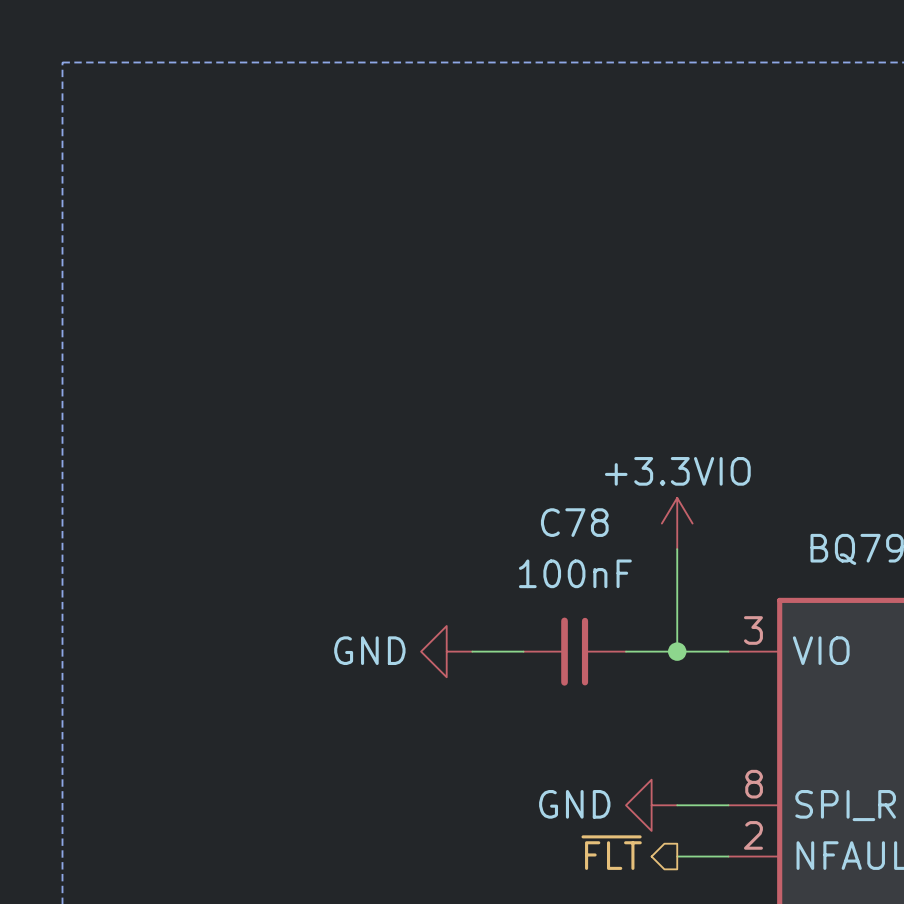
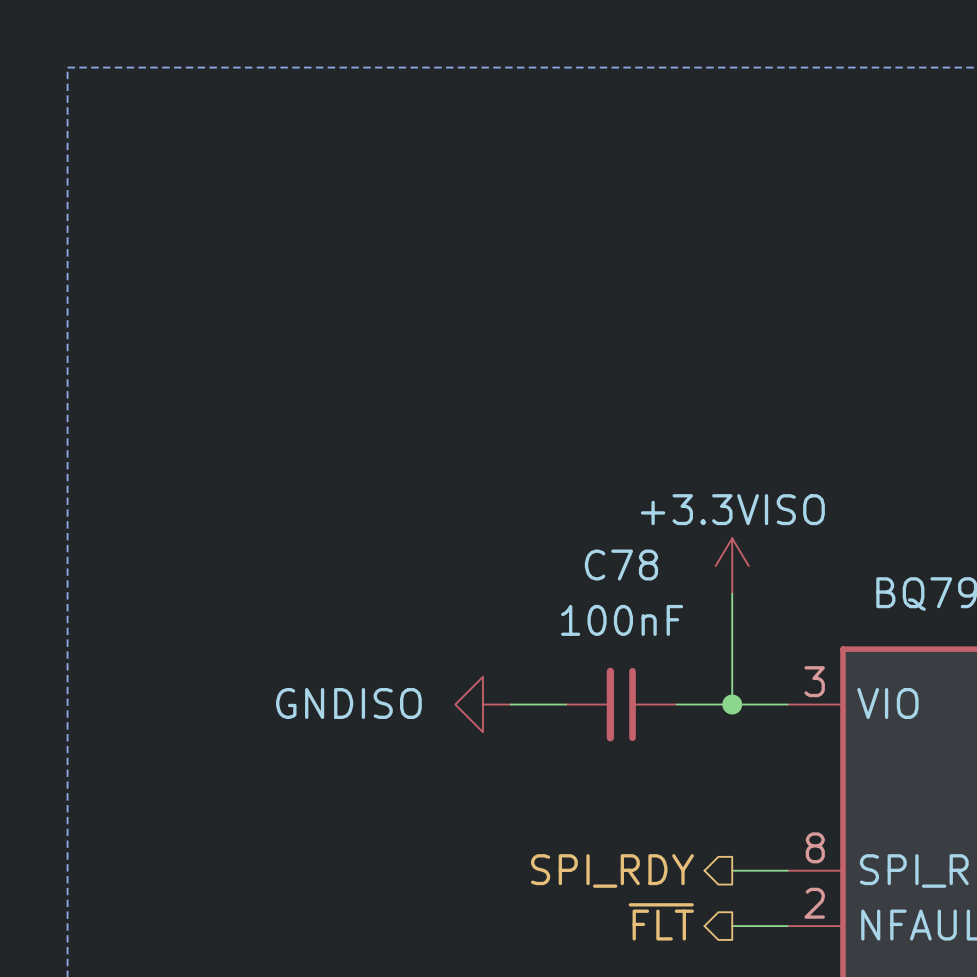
power symbol: +3.3VIO (677, 523) -> +3.3VISO (732, 566)
power symbol: GND (446, 651) -> GNDISO (482, 704)
hierarchical label: none -> SPI_RDY (612, 870)
power symbol: GND (651, 805) -> none

